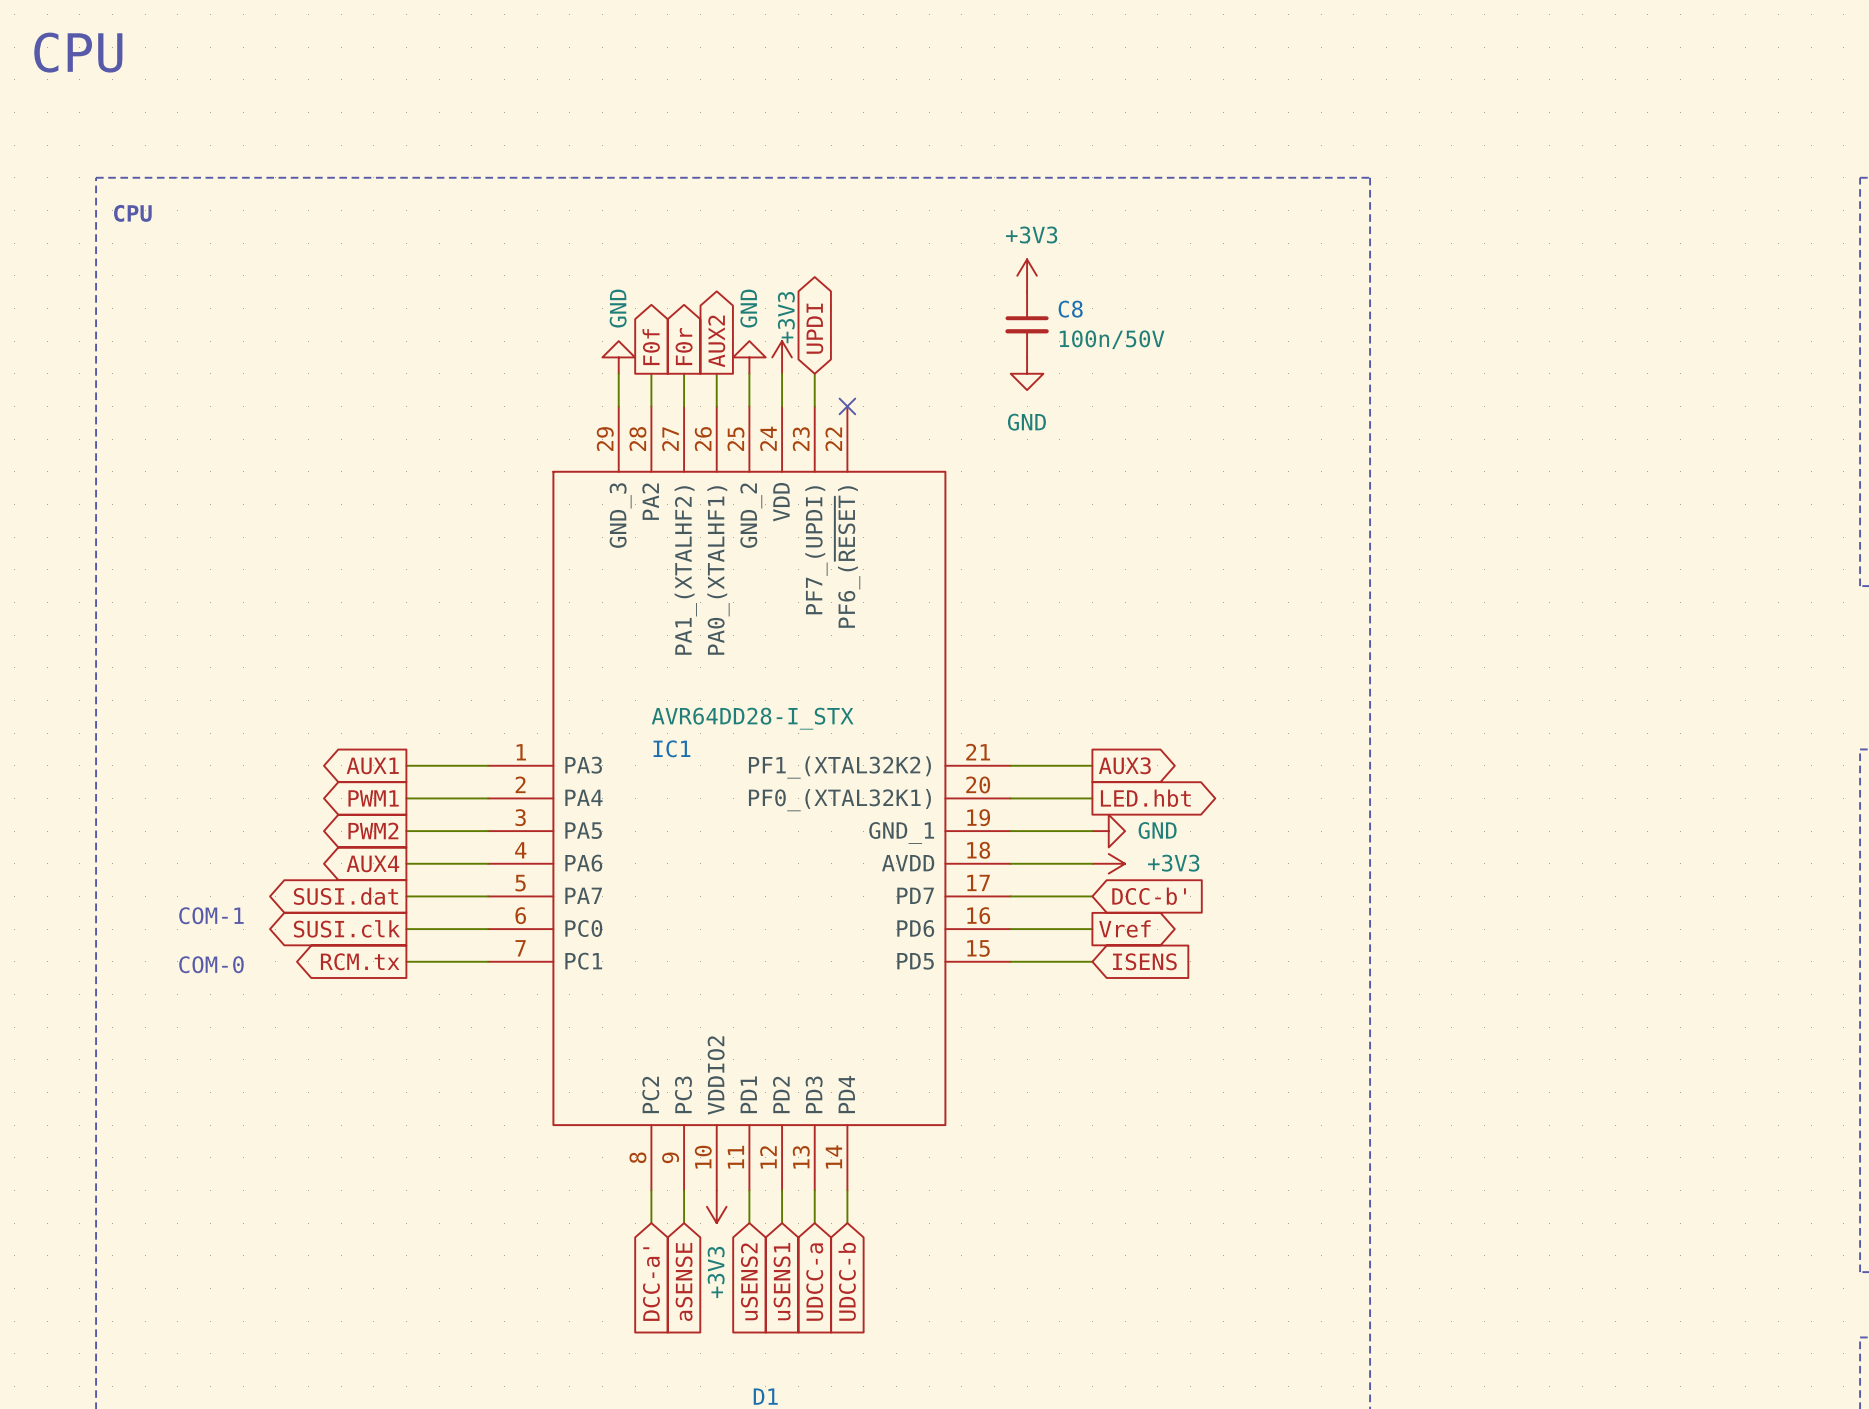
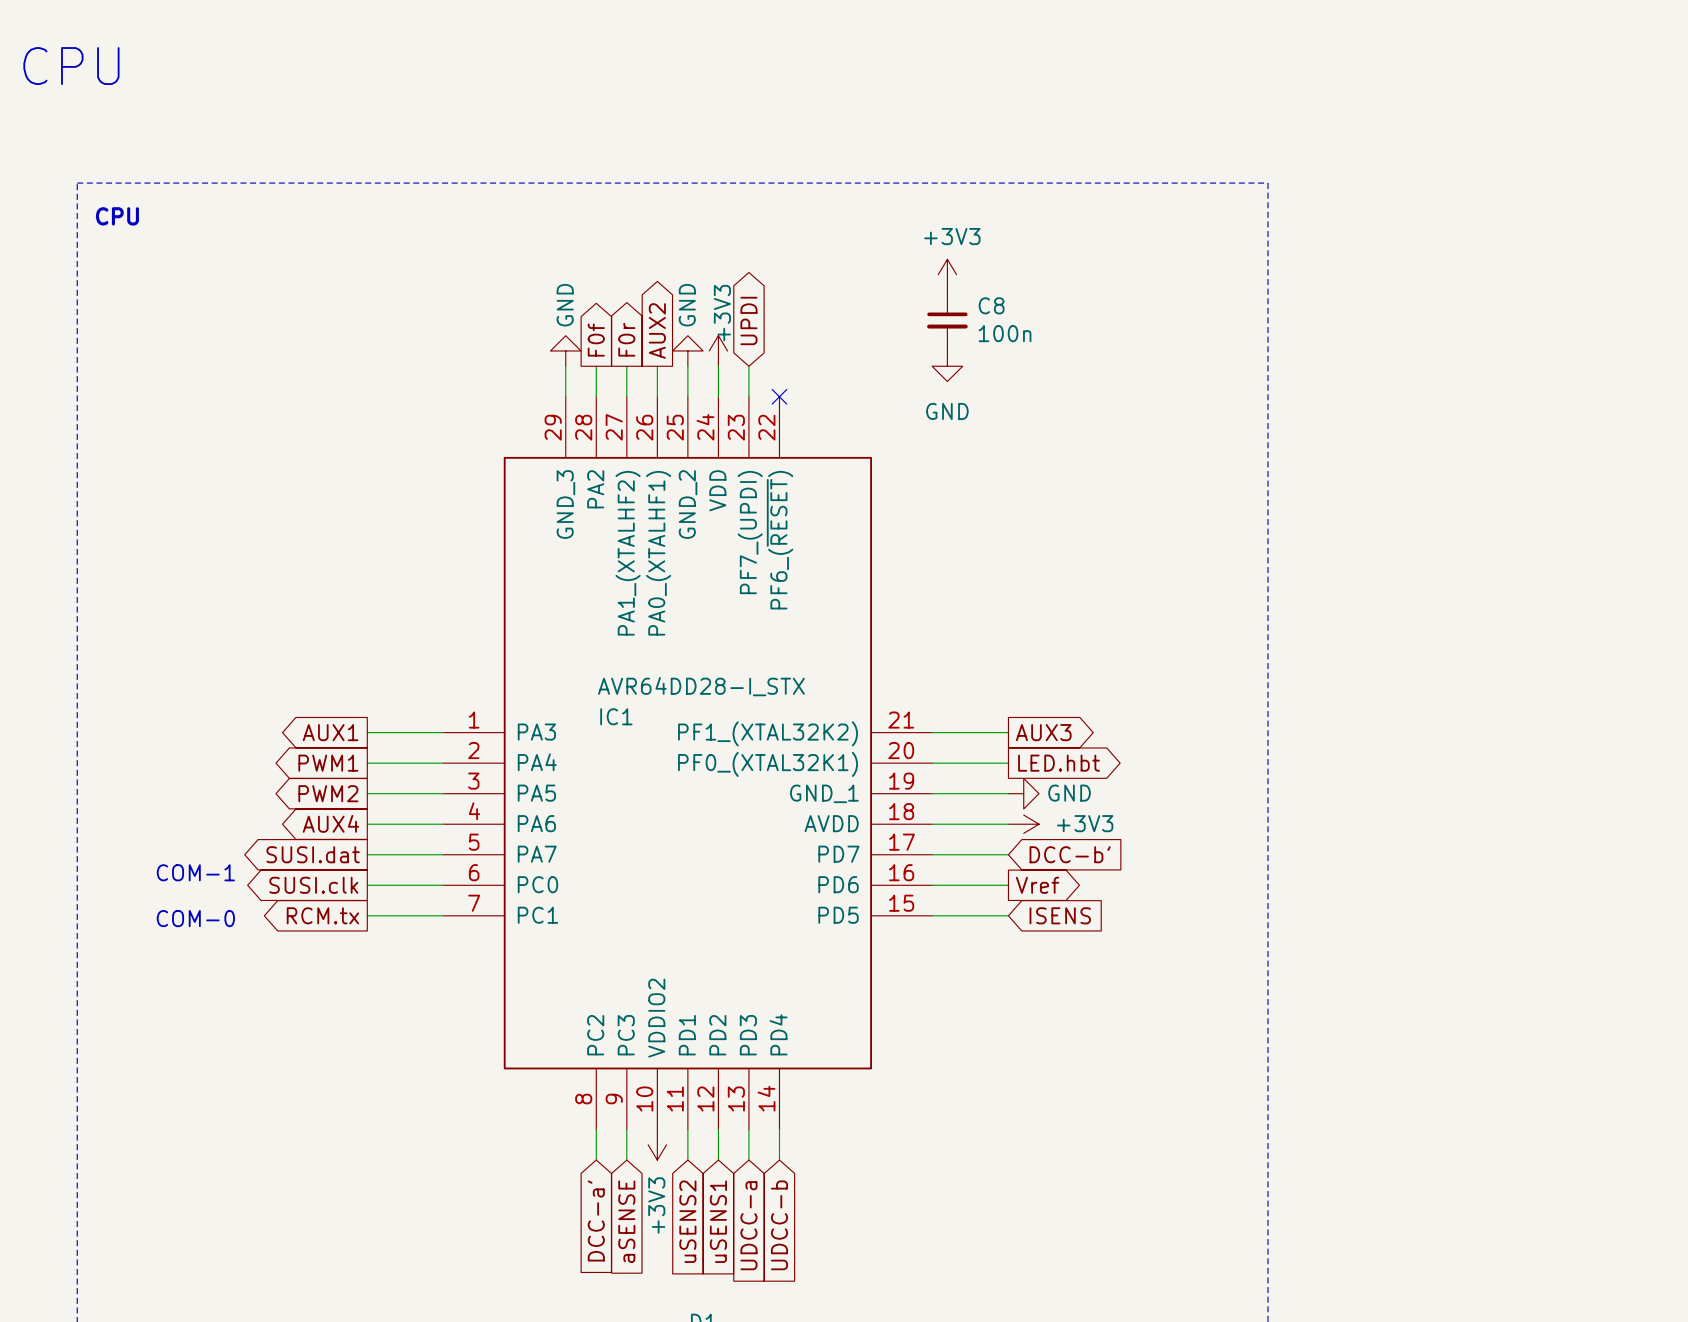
C8 value: 100n/50V (1112, 339) -> 100n (1005, 333)

